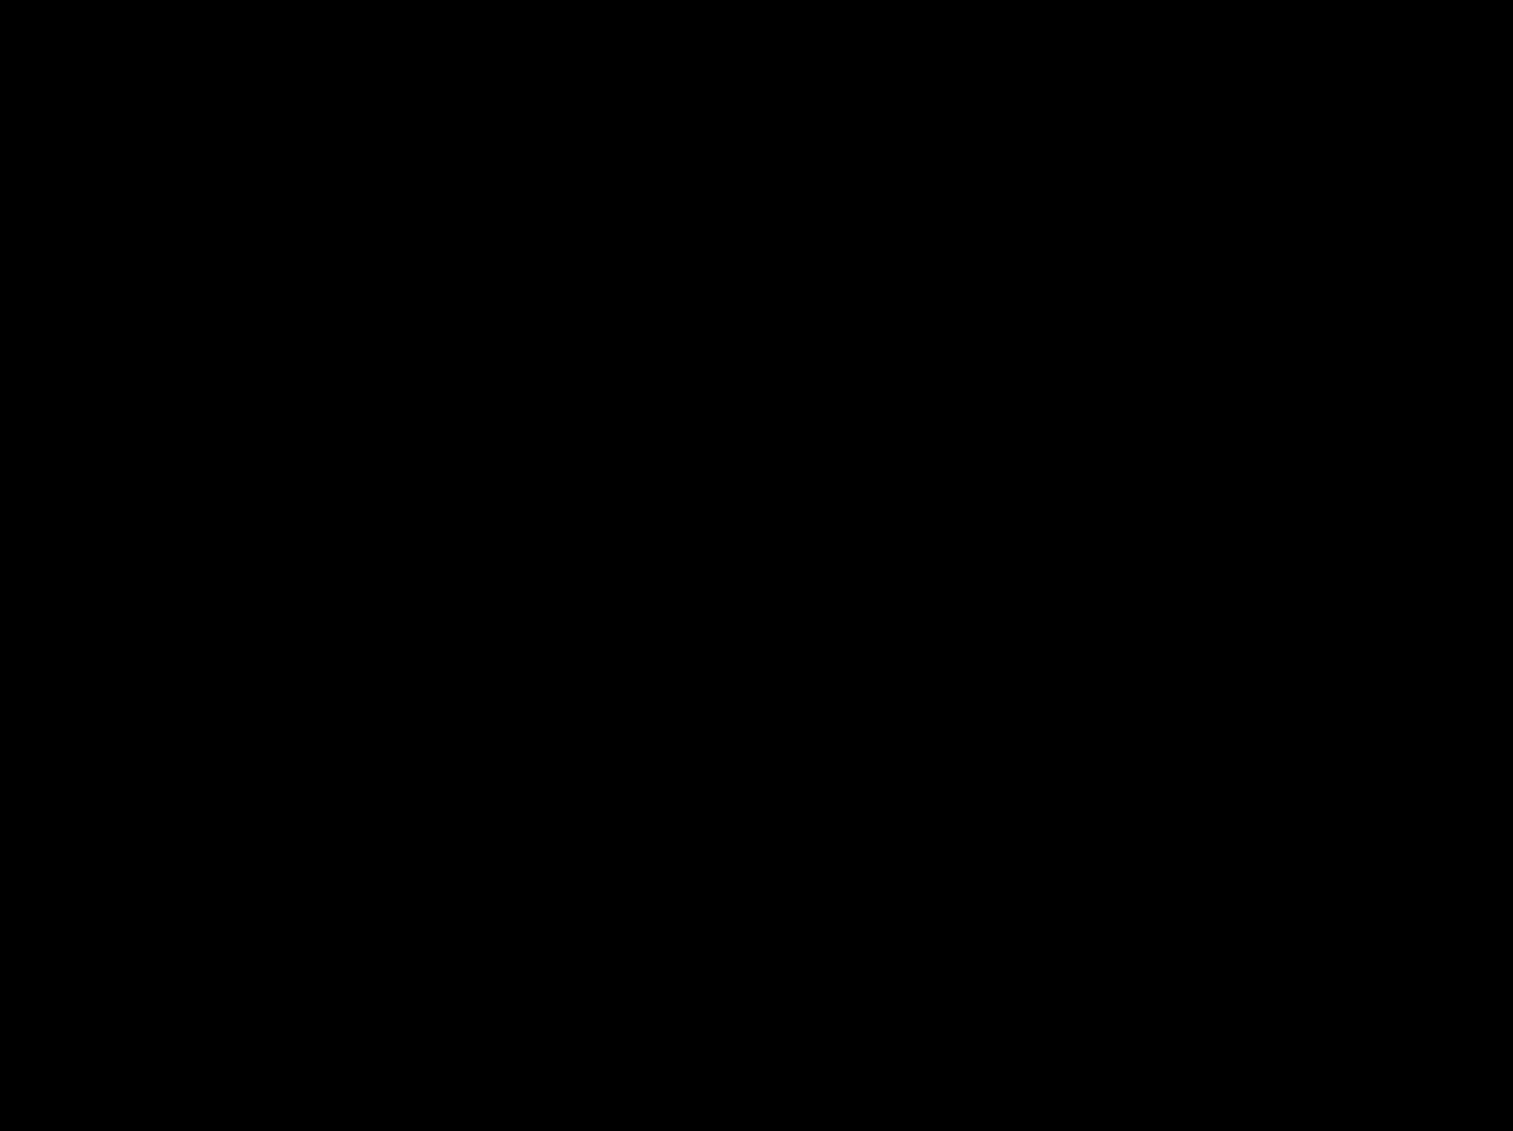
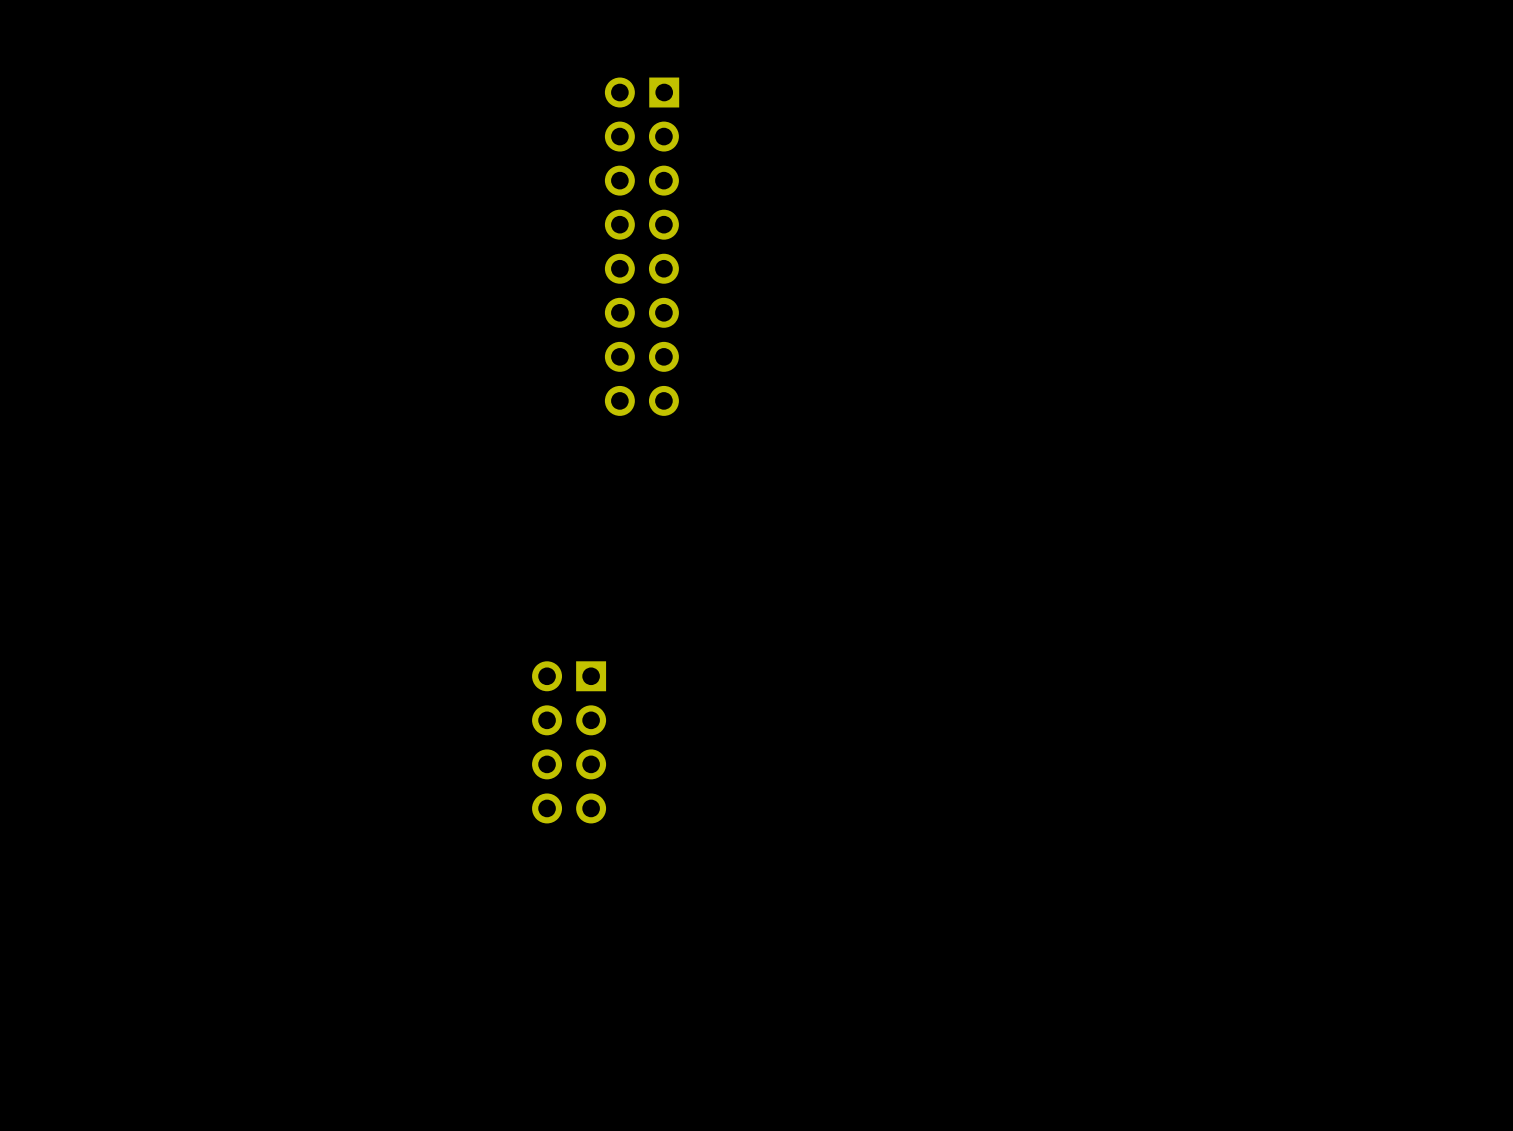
part: none -> (642, 246)
part: none -> (569, 742)

